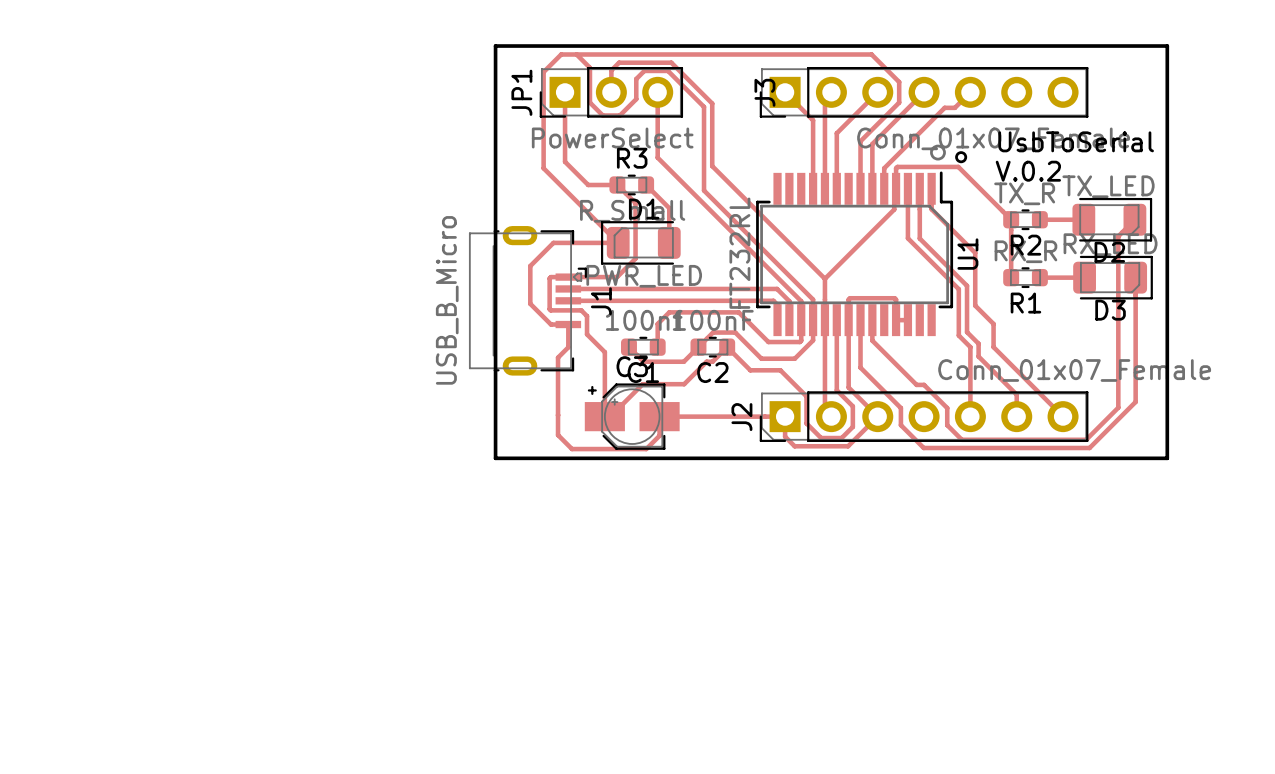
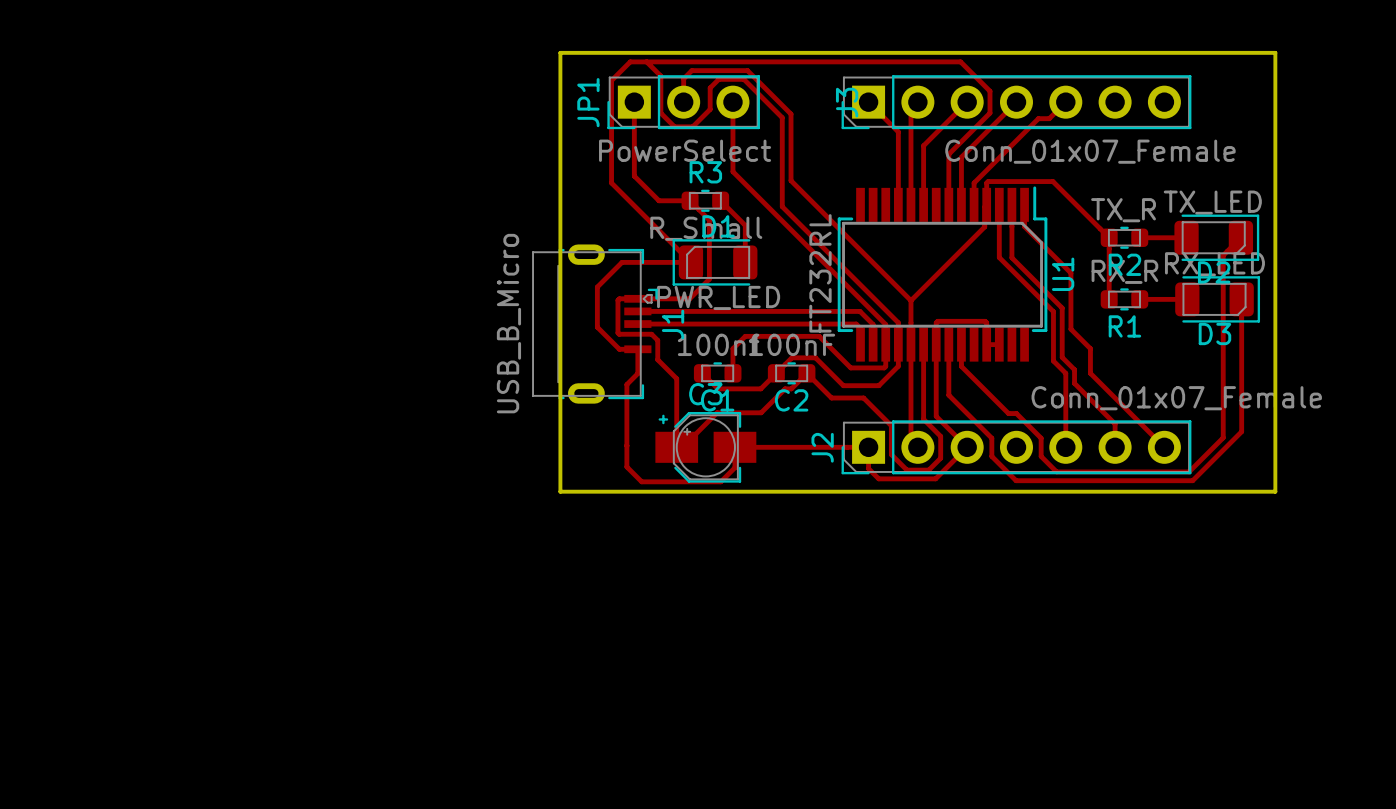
text: UsbToSerial (1076, 141) -> none
drawing: [930, 144, 968, 164] -> none
text: V.0.2 (1028, 171) -> none

